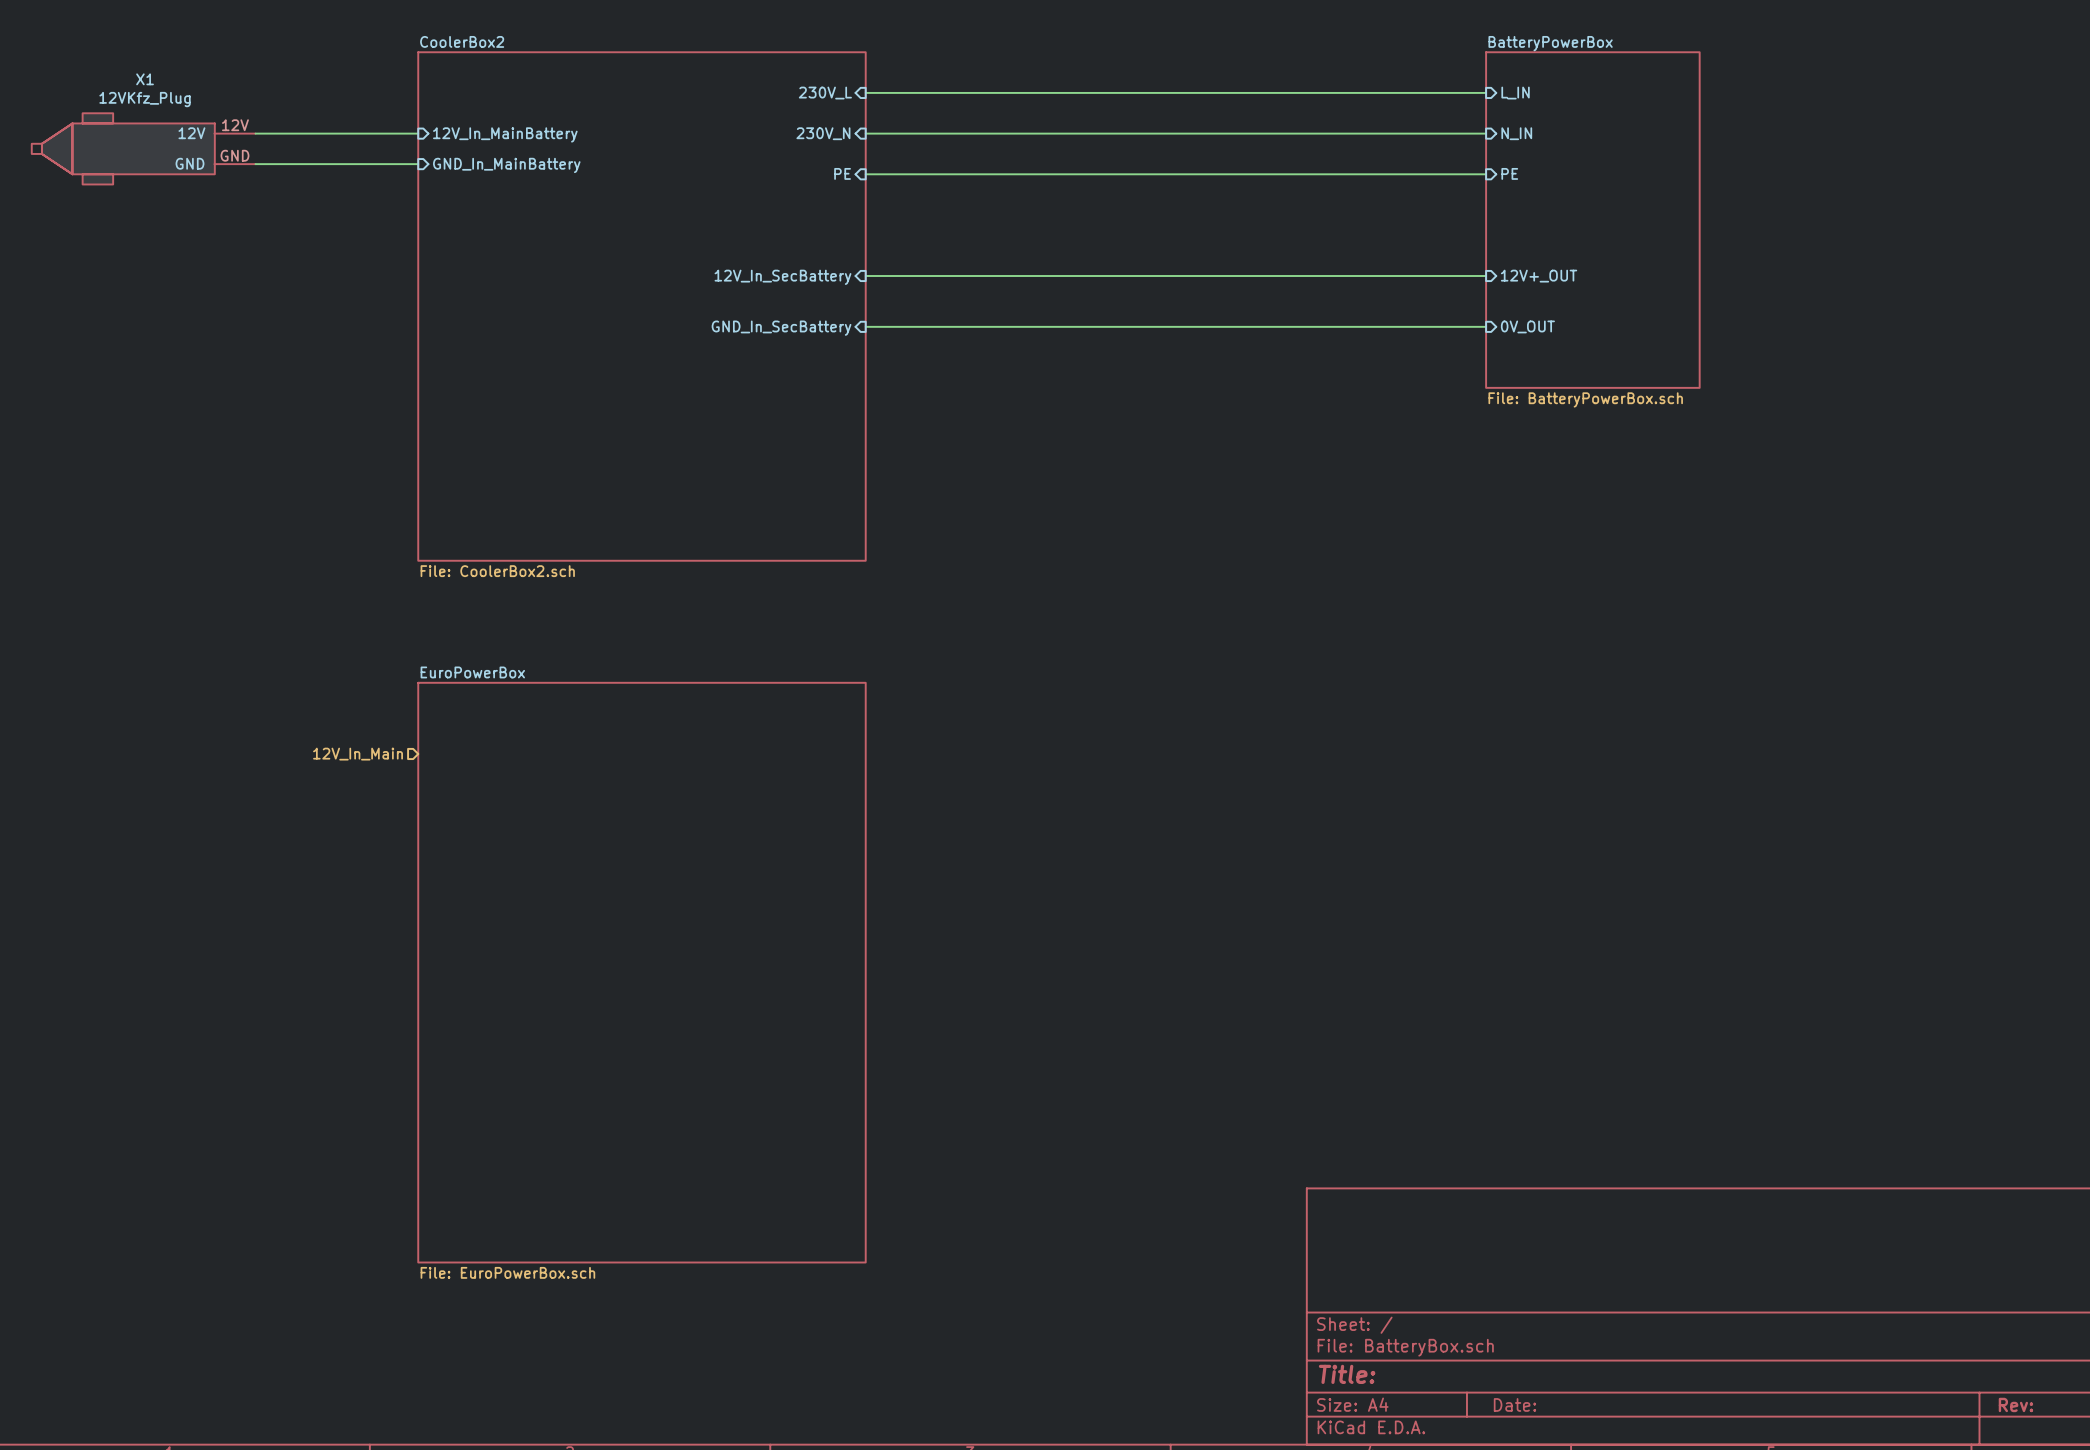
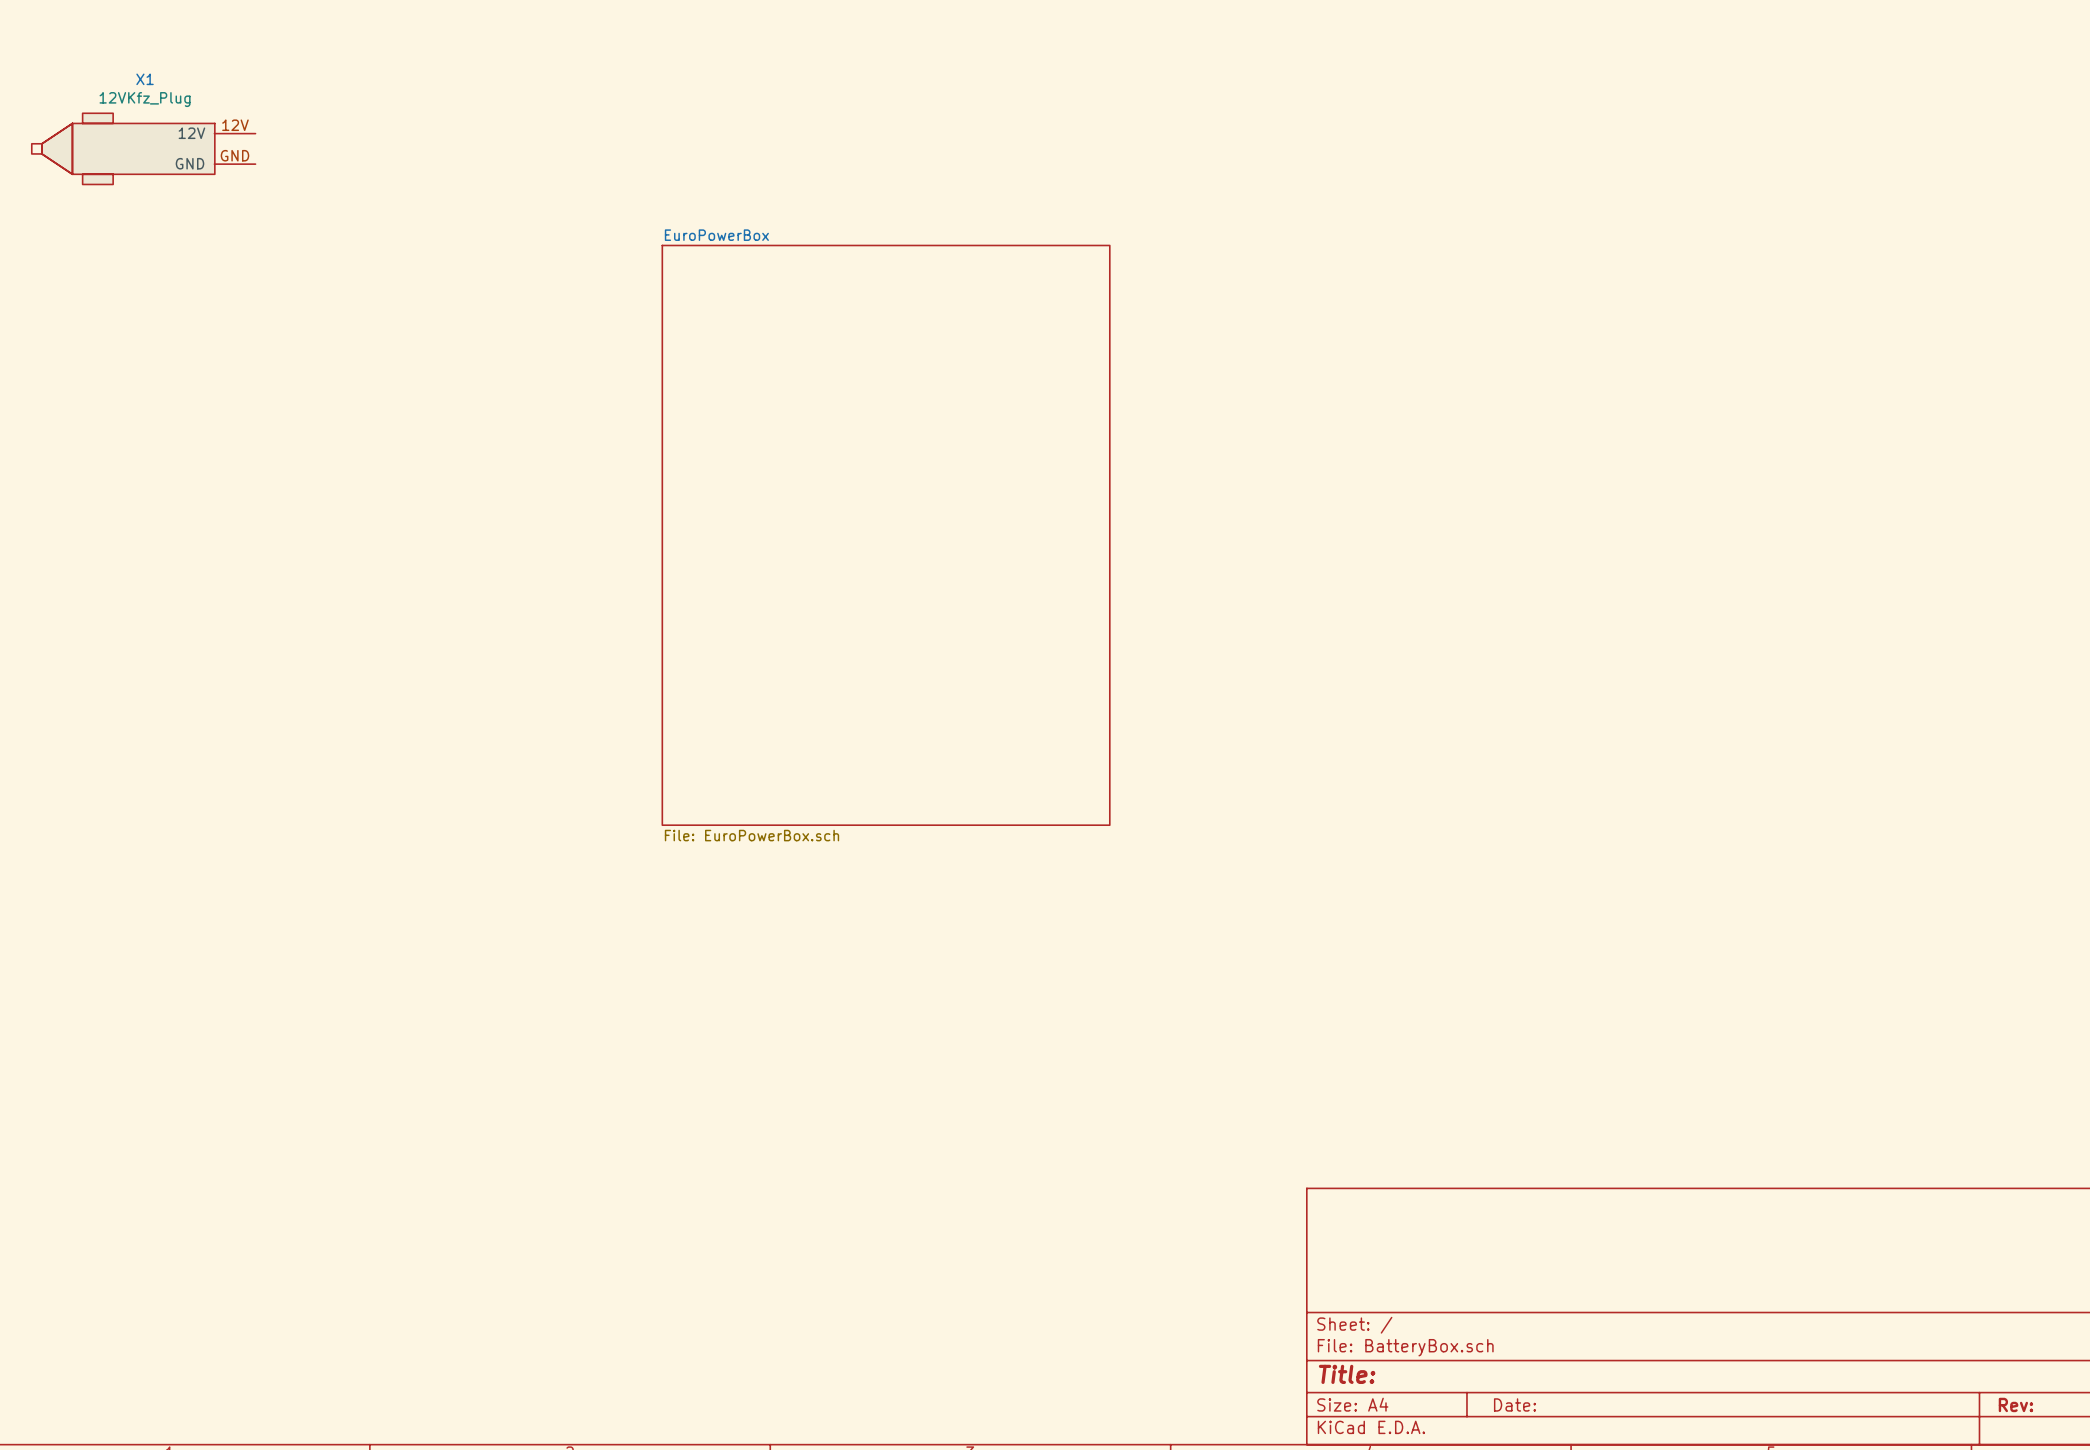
wire: (865, 92) (1486, 92) -> none
sheet pin: 230V_L (825, 93) -> none
sheet pin: L_IN (1515, 93) -> none
wire: (255, 133) (418, 133) -> none
sheet pin: 230V_N (823, 133) -> none
wire: (865, 133) (1486, 133) -> none
sheet pin: N_IN (1516, 133) -> none
sheet pin: 12V_In_MainBattery (505, 134) -> none
wire: (255, 164) (418, 164) -> none
sheet pin: GND_In_MainBattery (506, 165) -> none
sheet pin: PE (842, 173) -> none
sheet pin: PE (1509, 173) -> none
wire: (865, 174) (1486, 174) -> none
sheet BatteryPowerBox: File: BatteryPowerBox.sch (1592, 220) -> none
wire: (865, 275) (1486, 275) -> none
sheet pin: 12V+_OUT (1539, 276) -> none
sheet pin: 12V_In_SecBattery (782, 277) -> none
sheet CoolerBox2: File: CoolerBox2.sch (641, 306) -> none
wire: (865, 326) (1486, 326) -> none
sheet pin: 0V_OUT (1527, 326) -> none
sheet pin: GND_In_SecBattery (781, 328) -> none
sheet EuroPowerBox: none -> File: EuroPowerBox.sch (886, 535)
hierarchical label: 12V_In_Main (358, 754) -> none
sheet EuroPowerBox: File: EuroPowerBox.sch (641, 972) -> none

